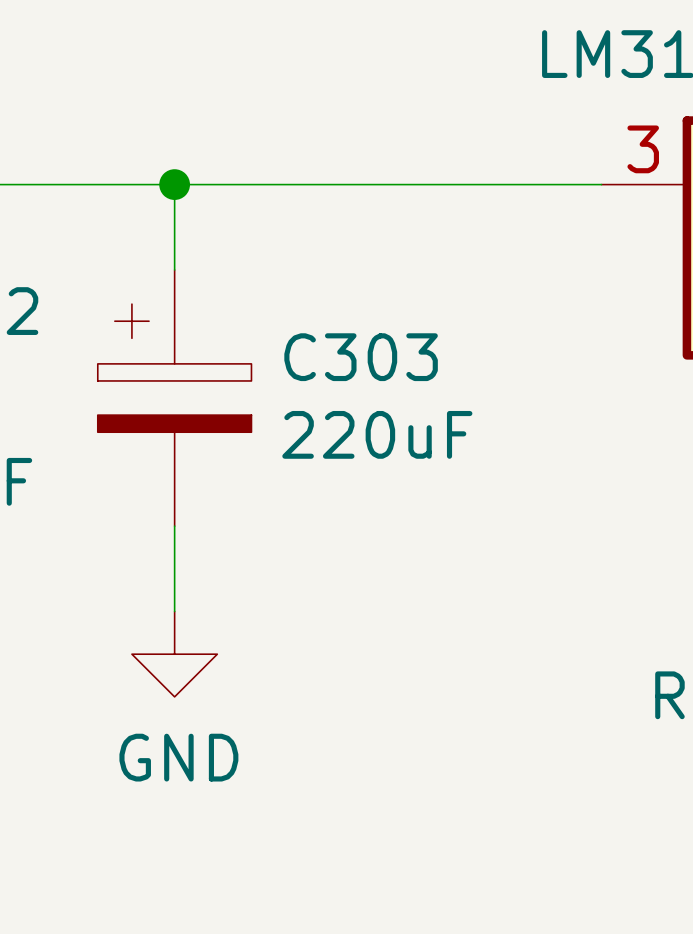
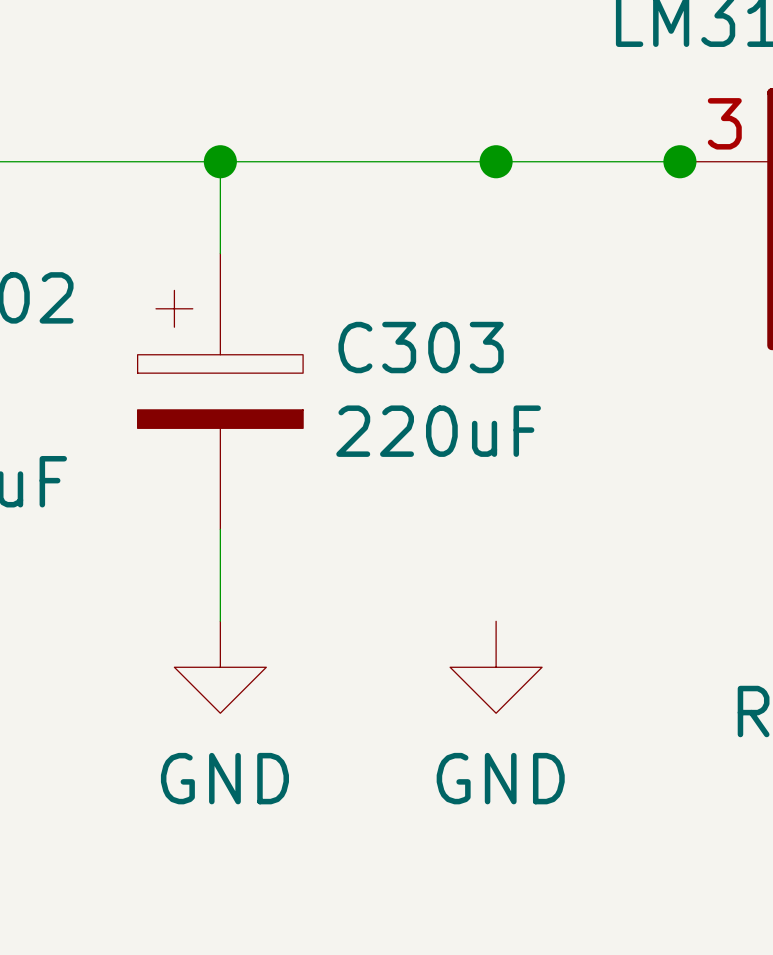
junction: none -> (496, 161)
junction: none -> (679, 161)
power symbol: none -> GND (496, 667)

